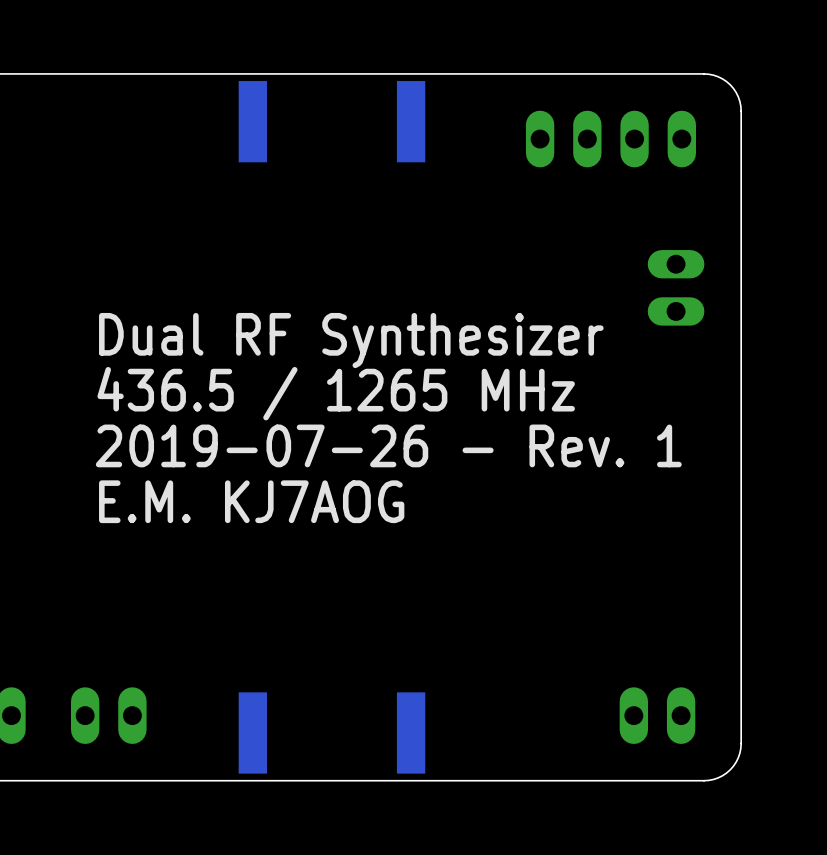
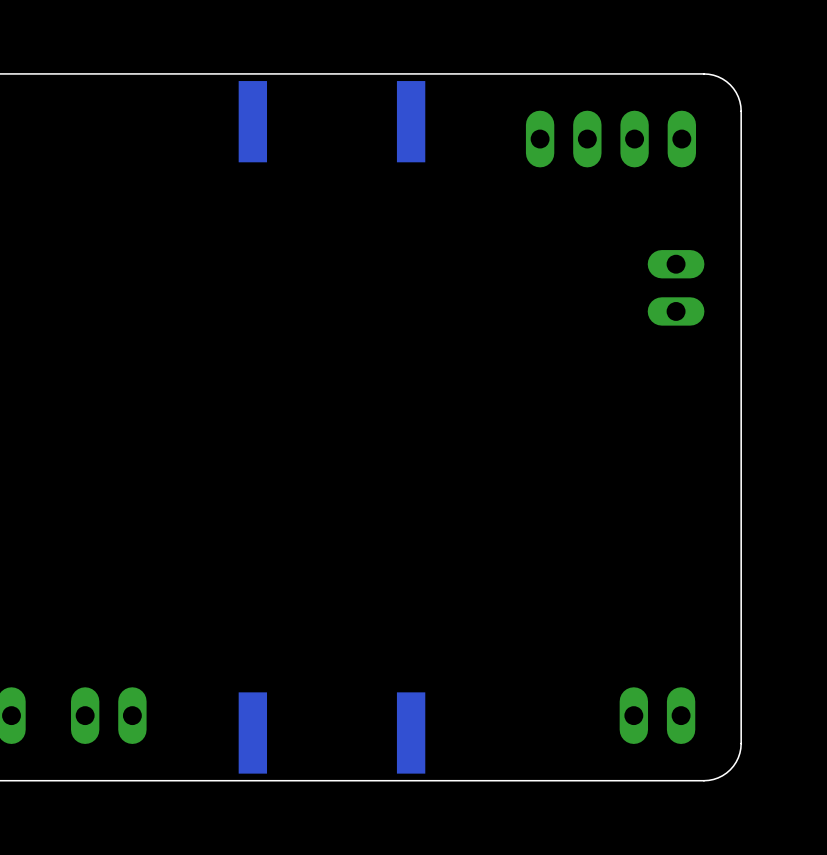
text: Dual RF Synthesizer (351, 340) -> none
text: 436.5 / 1265 MHz (336, 393) -> none
text: 2019-07-26 - Rev. 1 (388, 445) -> none
text: E.M. KJ7AOG (251, 501) -> none

